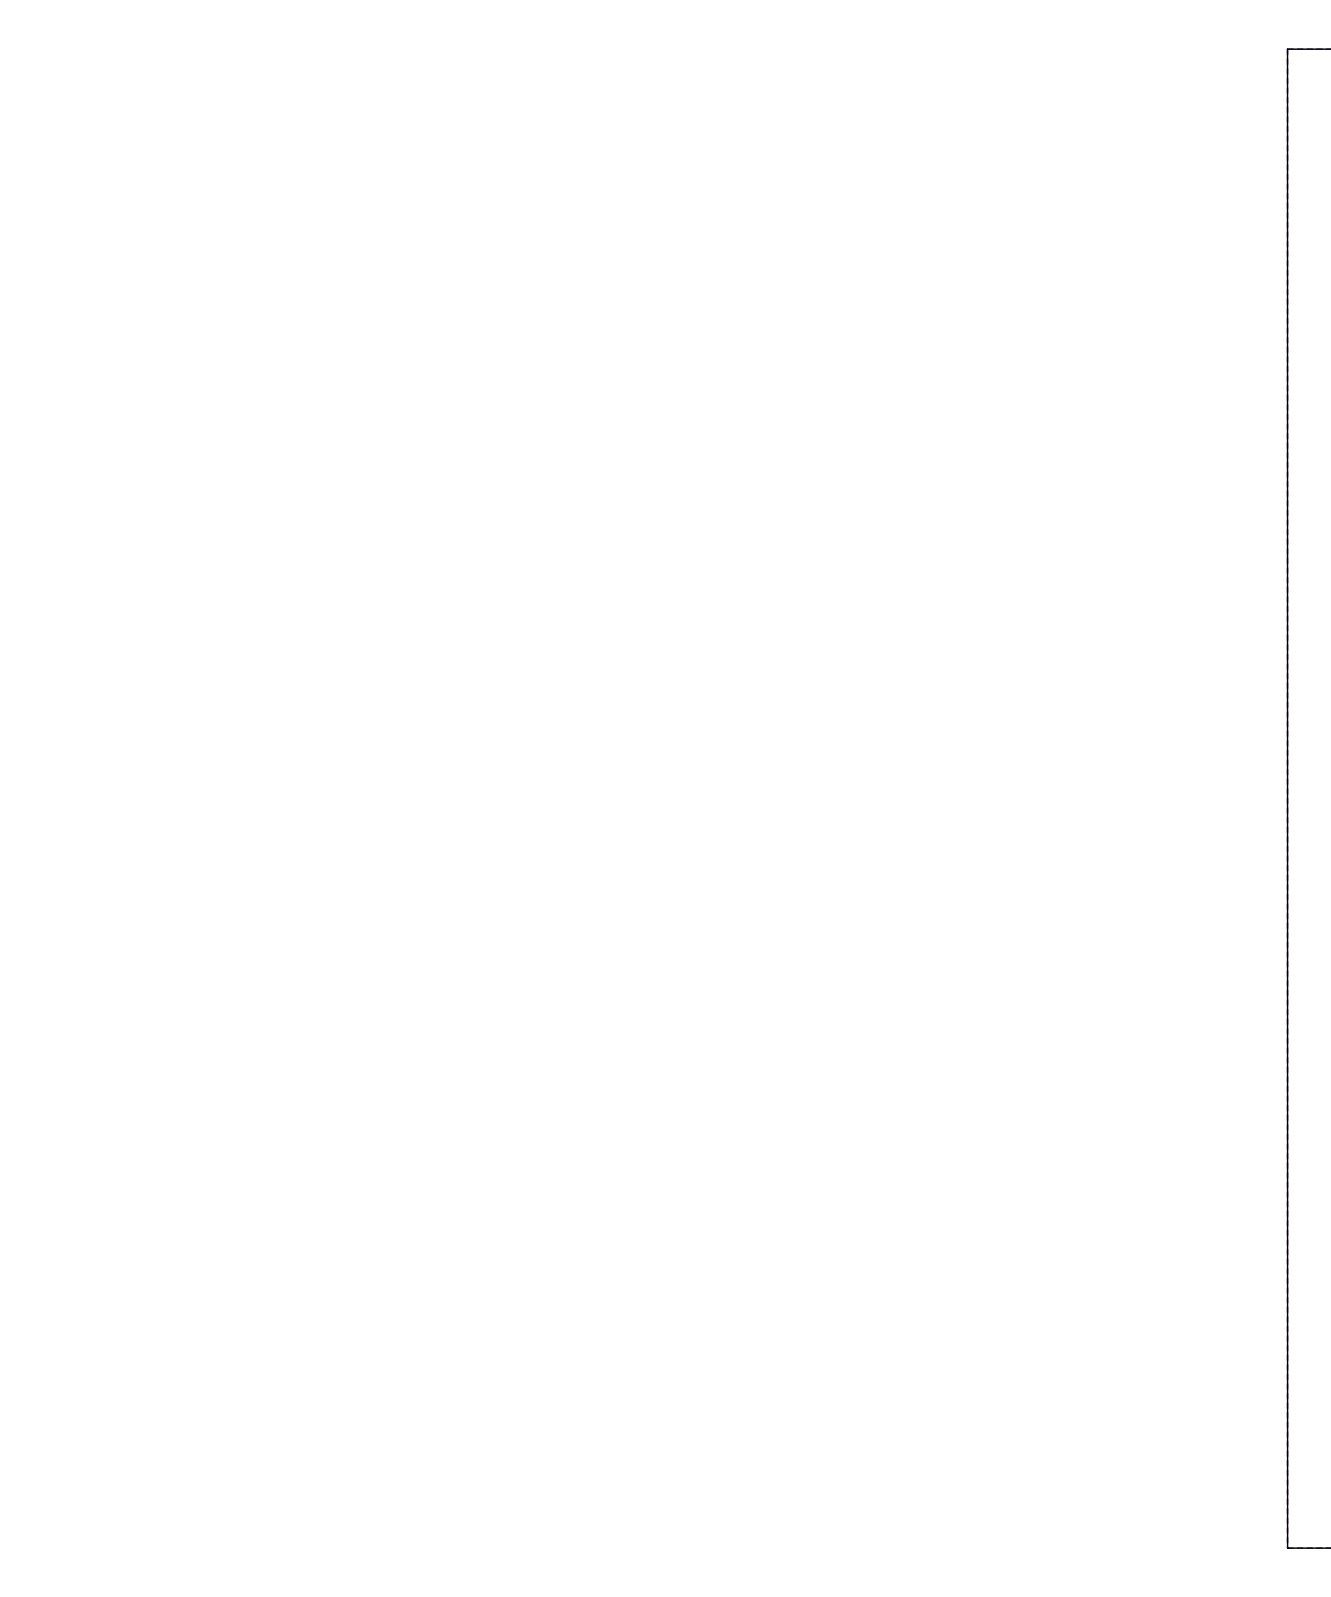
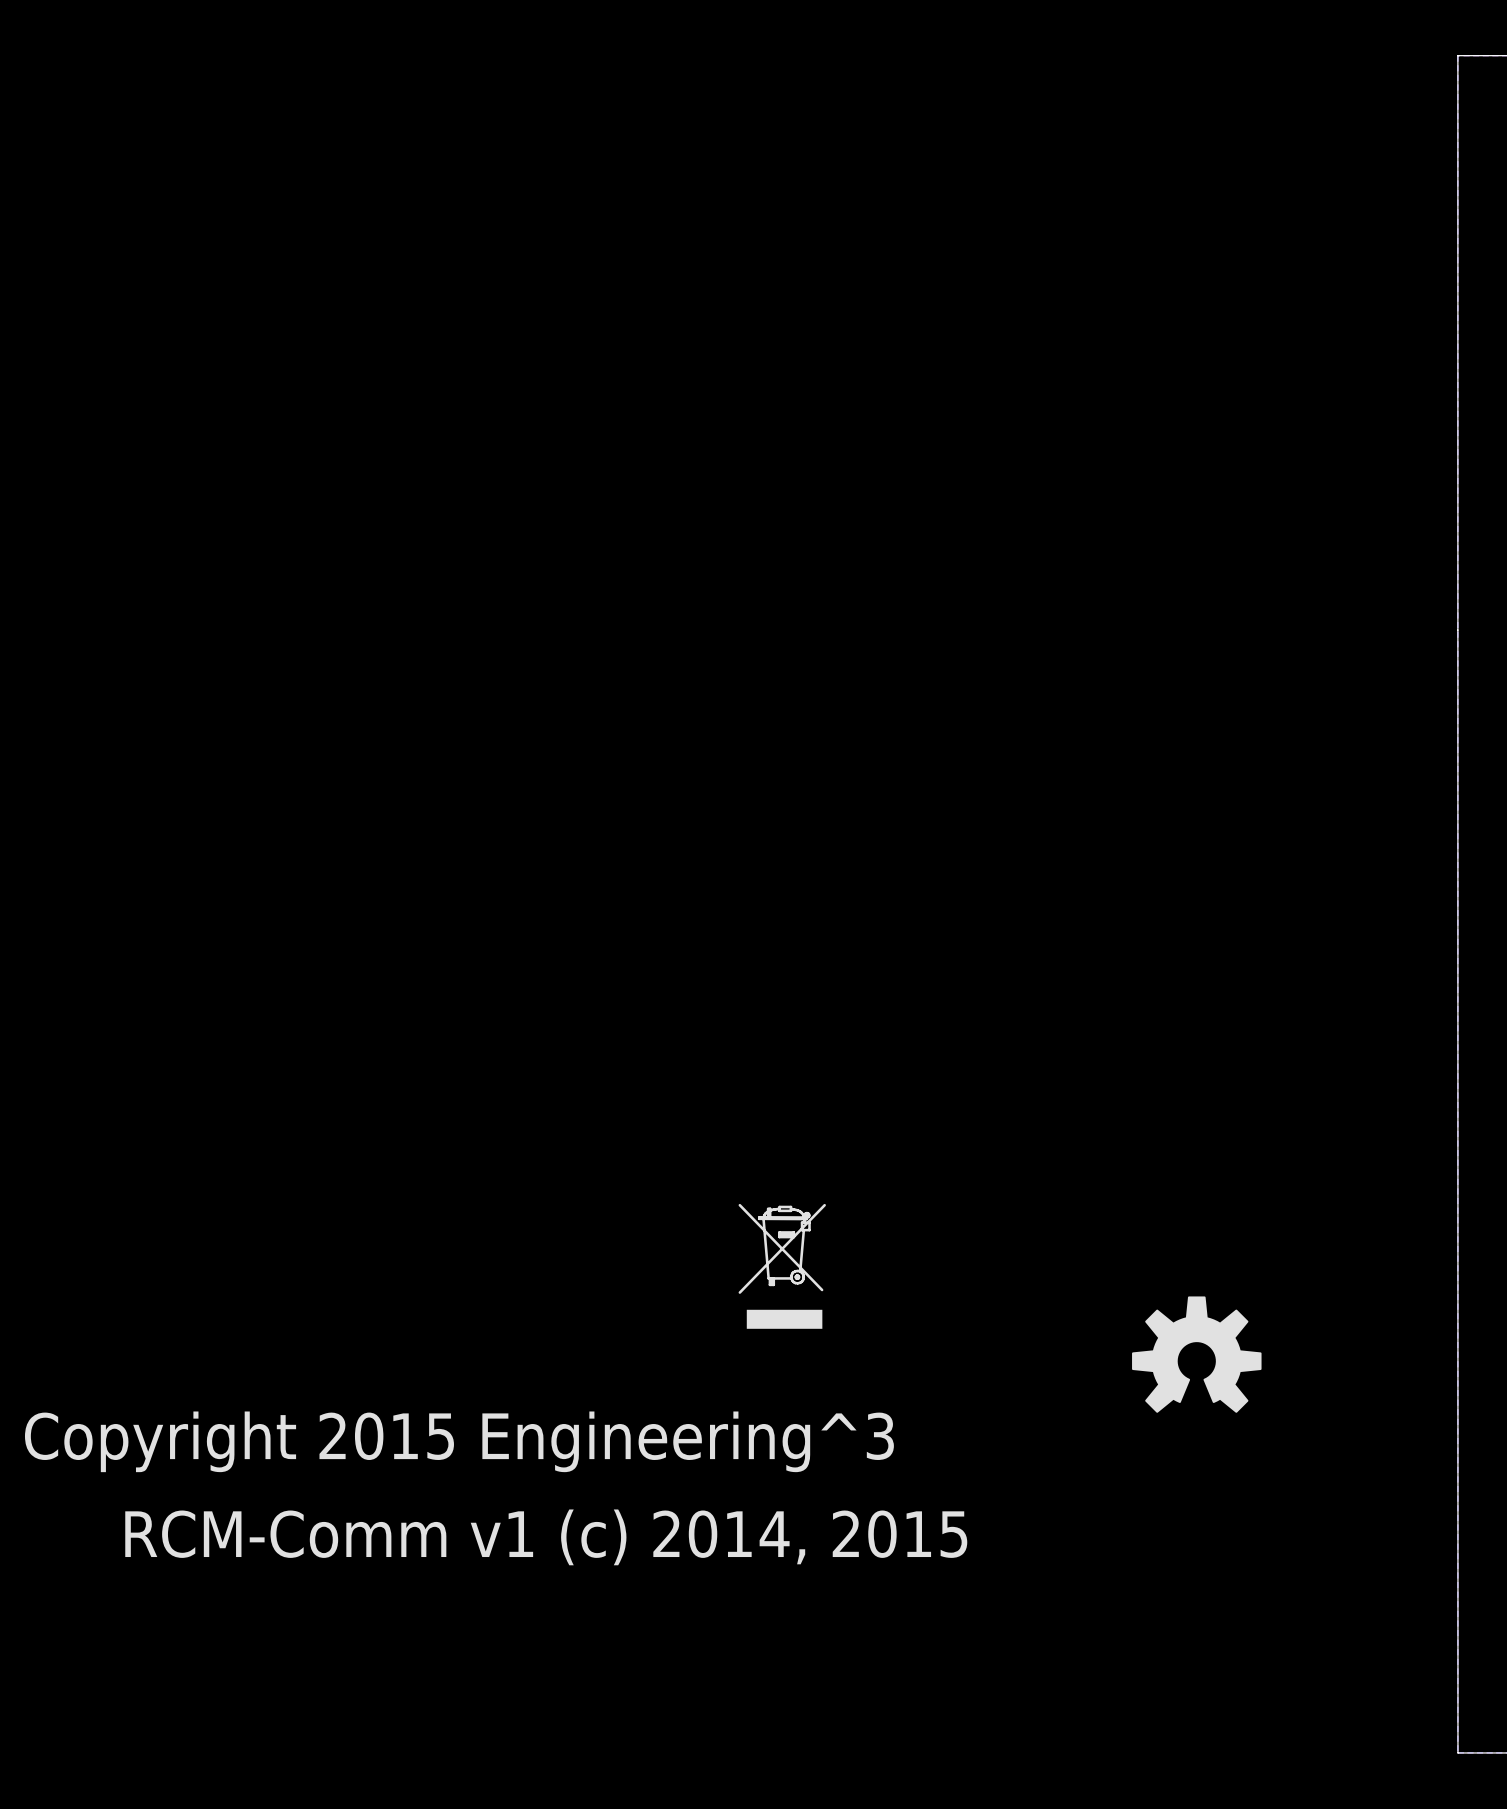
drawing: none -> [738, 1203, 826, 1329]
drawing: none -> [1132, 1296, 1262, 1413]
text: none -> Copyright 2015 Engineering^3 (459, 1441)
text: none -> RCM-Comm v1 (c) 2014, 2015 (546, 1537)

